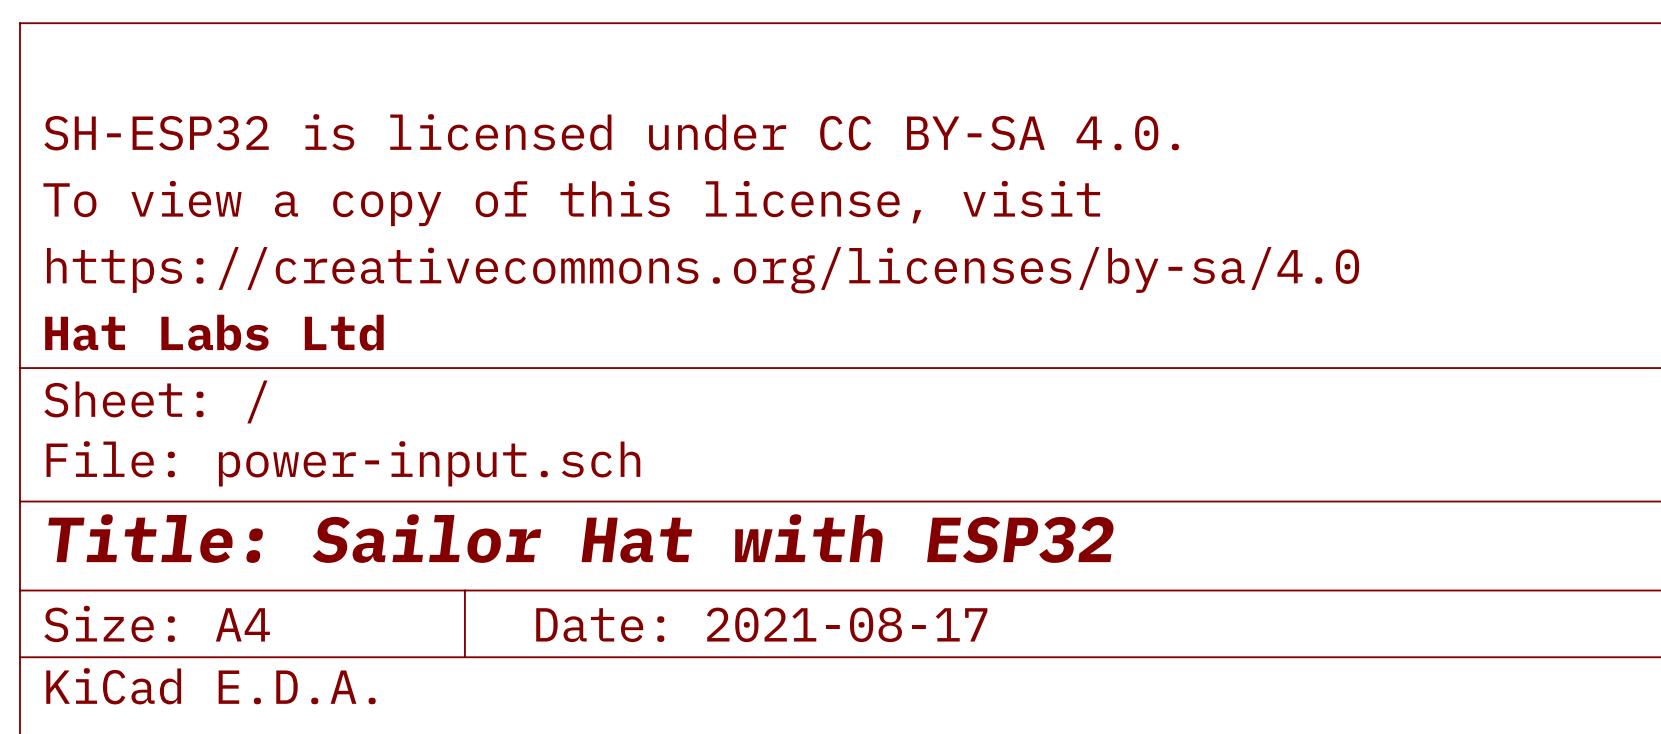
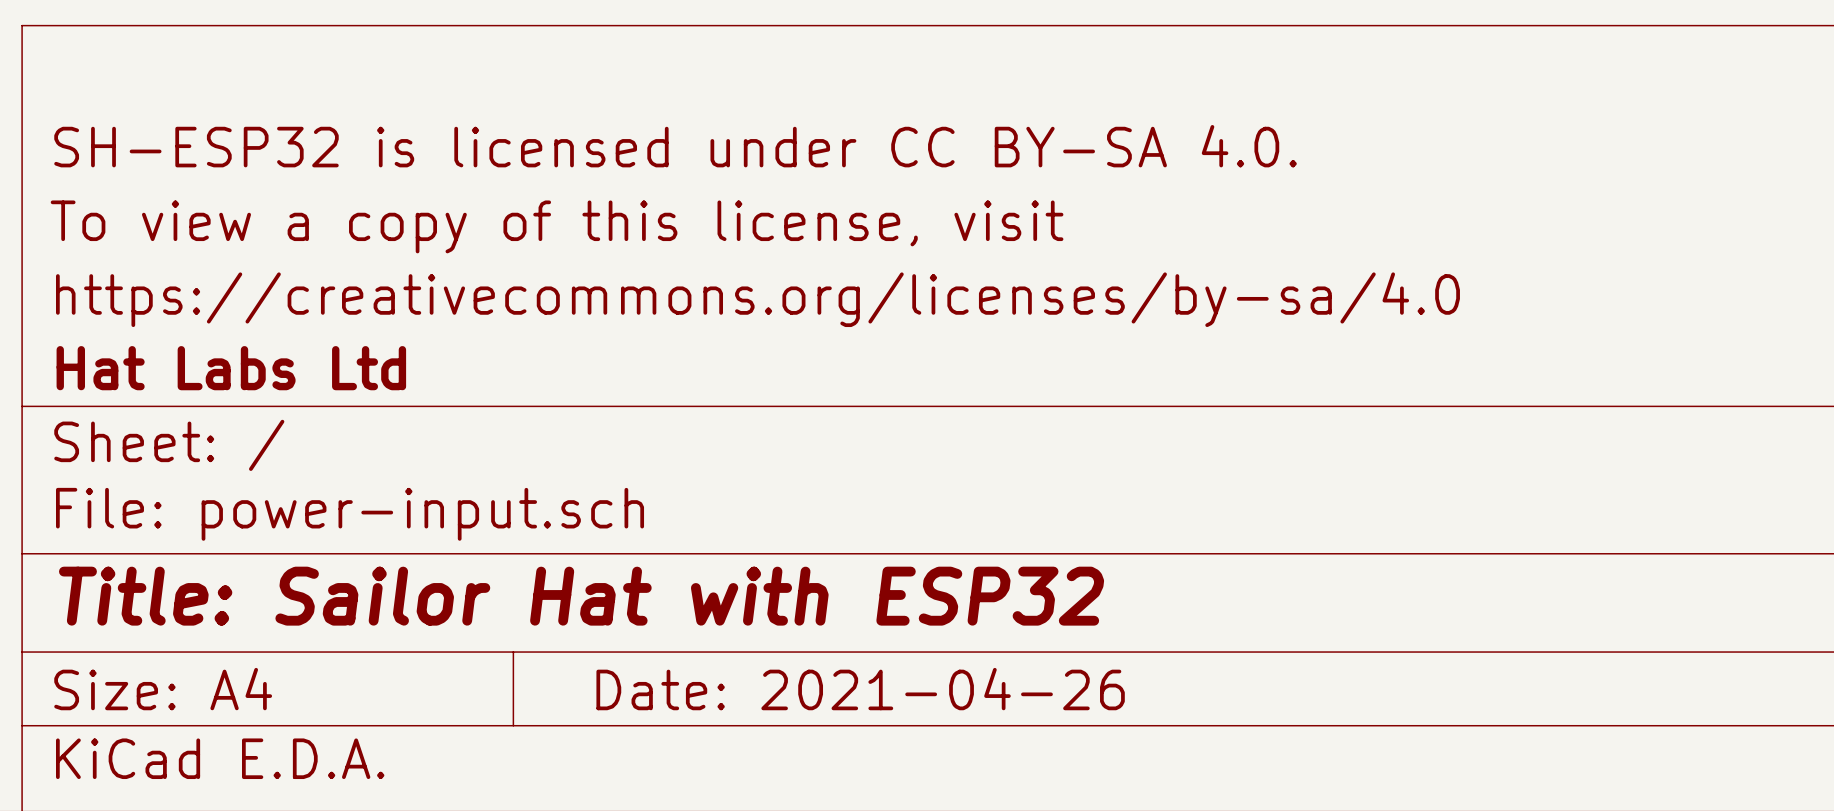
title block: Date: 2021-08-17 (761, 624) -> Date: 2021-04-26 (860, 689)

